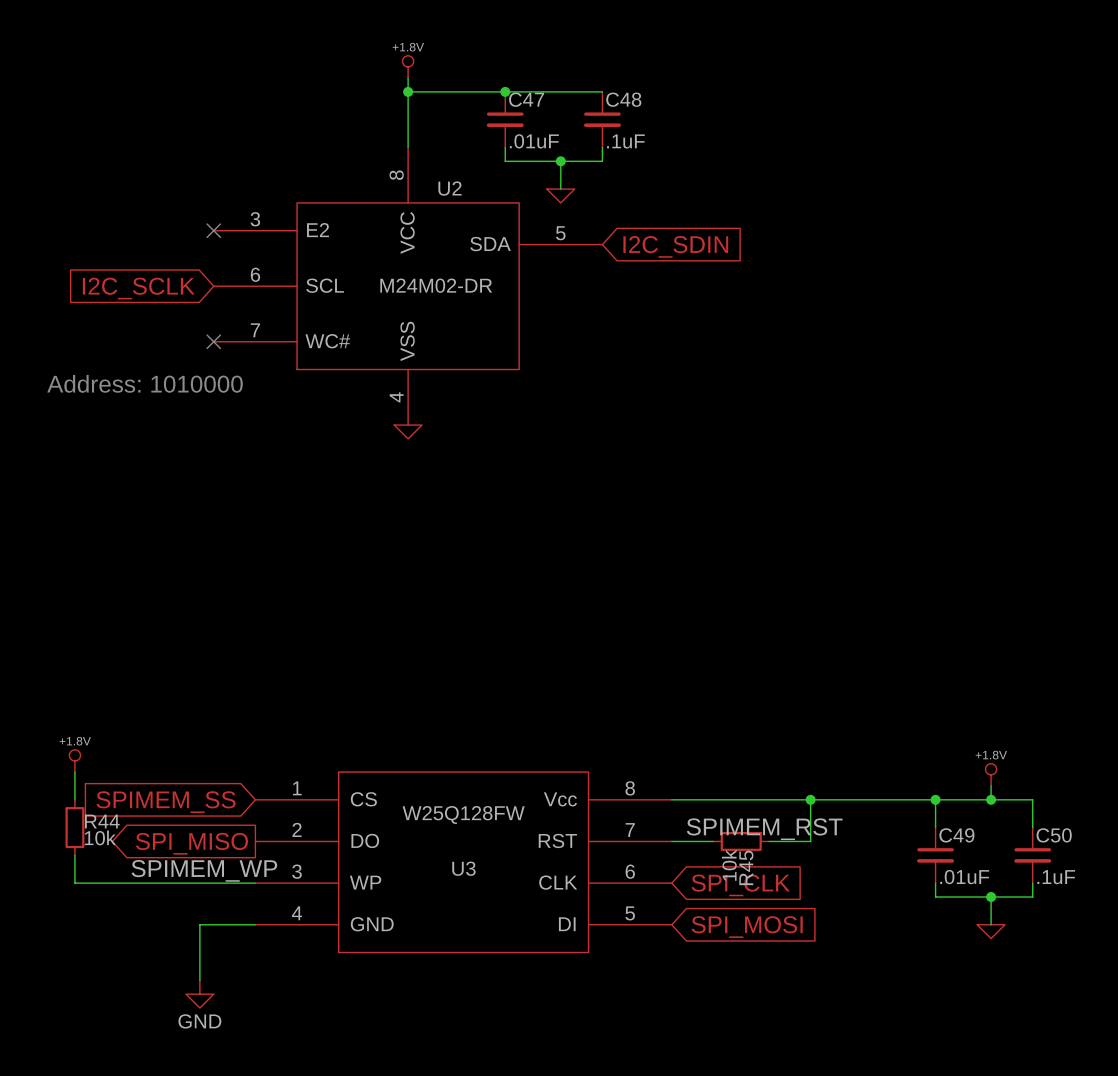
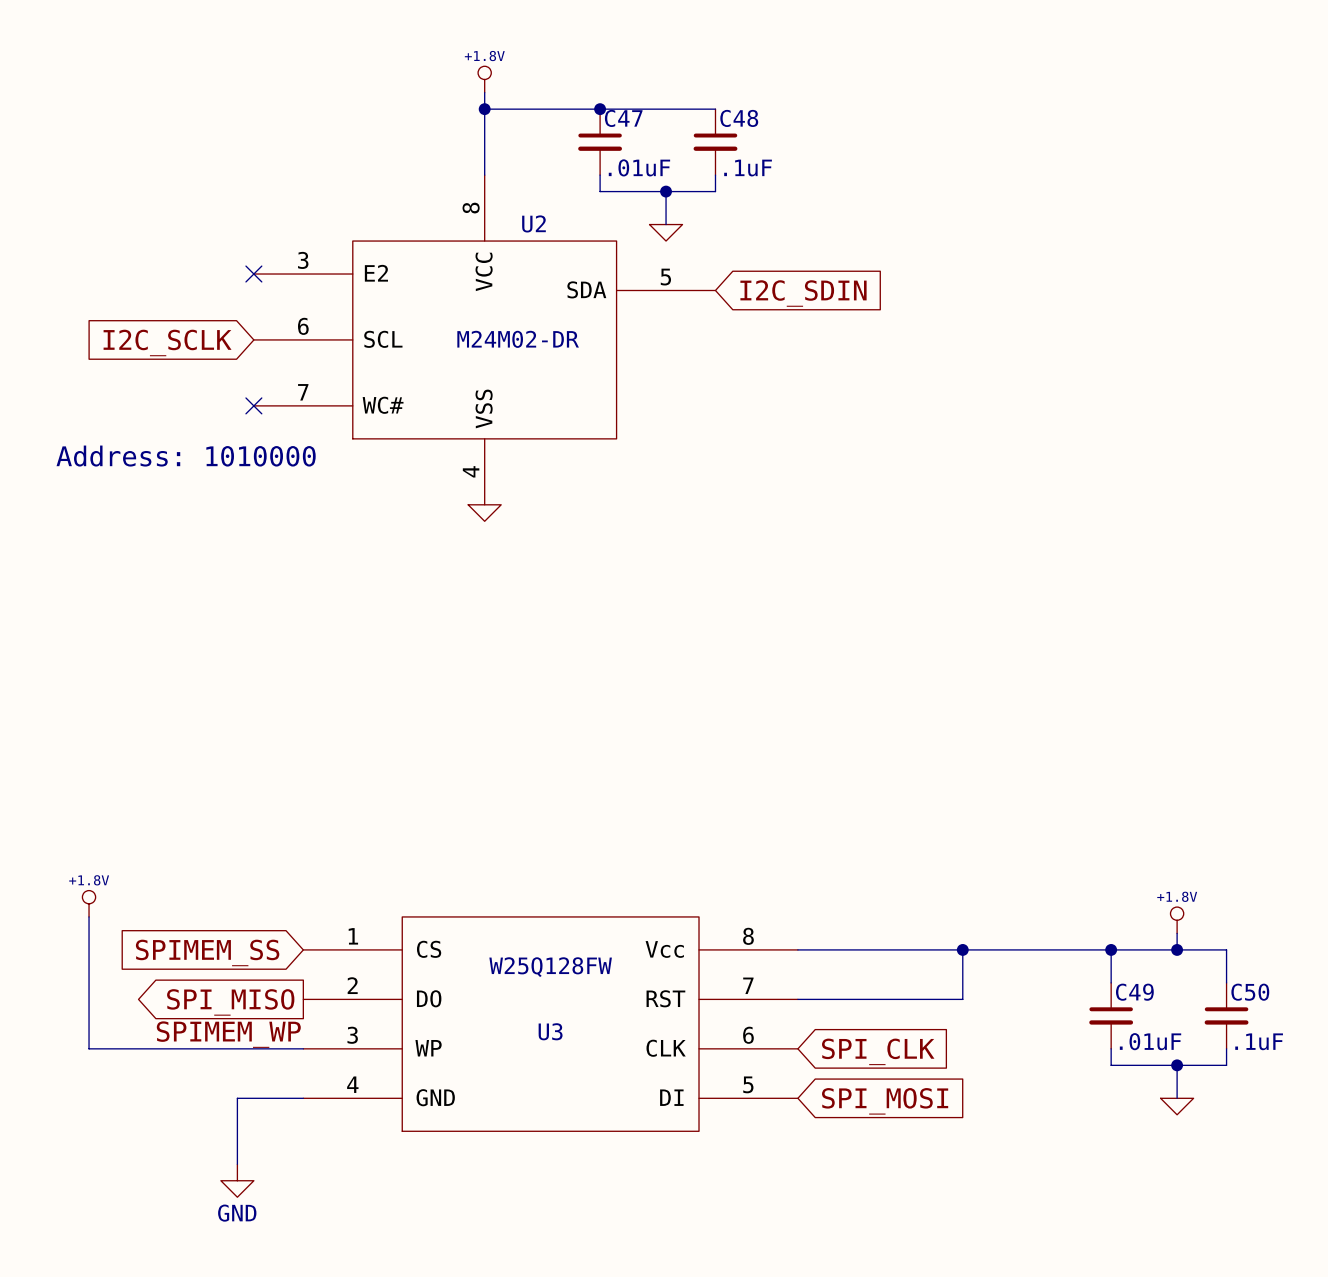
wire: none -> (89, 949) (89, 1015)
R44: 10k (74, 827) -> none
label: SPIMEM_RST (764, 829) -> none
wire: none -> (847, 999) (913, 999)
R45: 10k (741, 841) -> none

